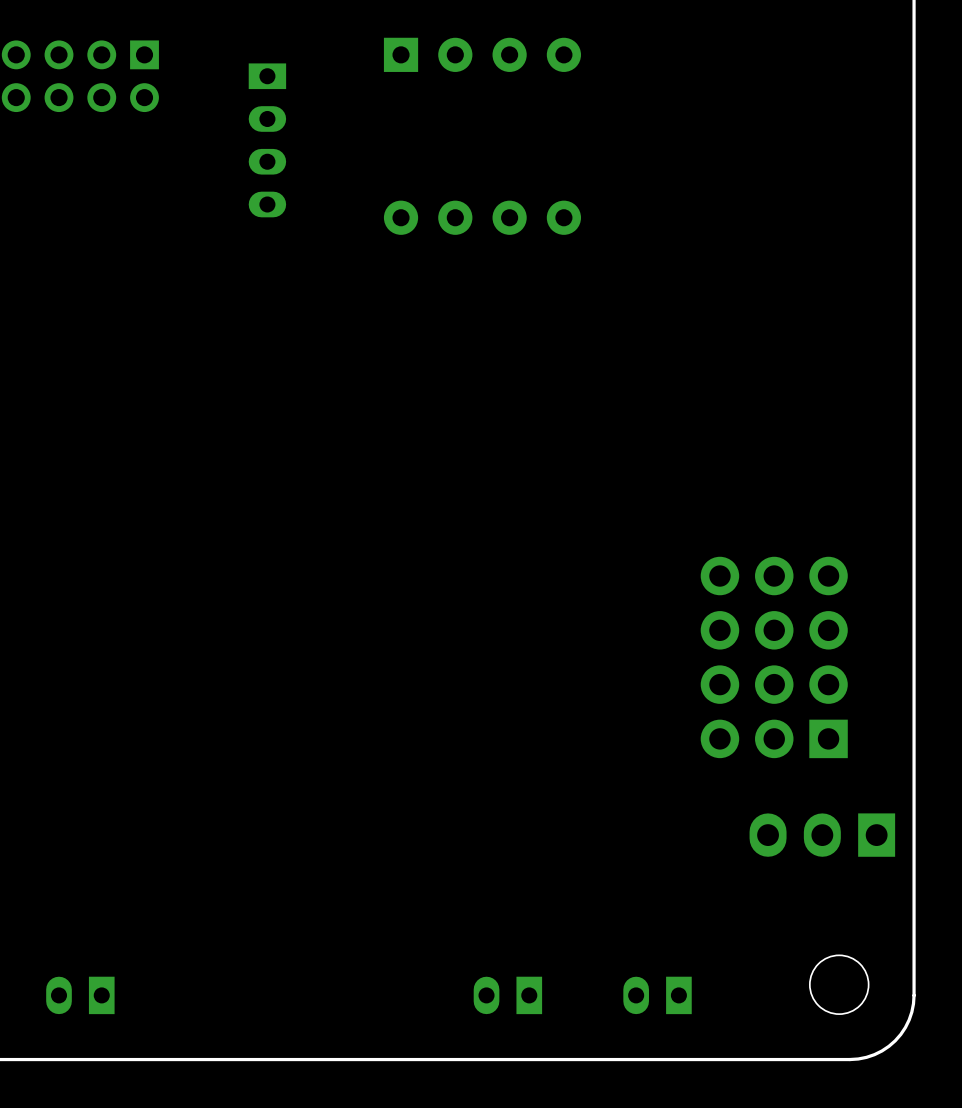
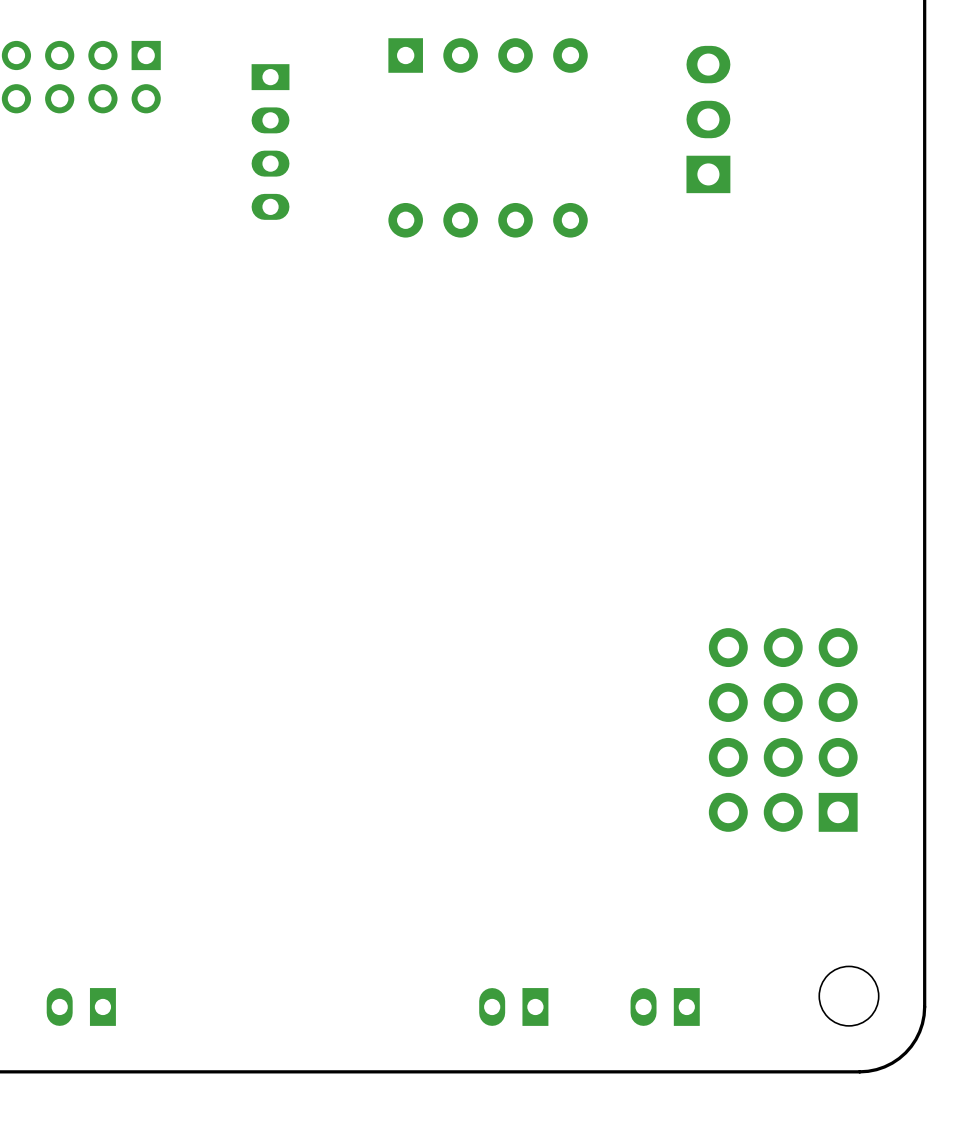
part: none -> (708, 119)
part position: (774, 657) -> (783, 729)
part: (822, 835) -> none

